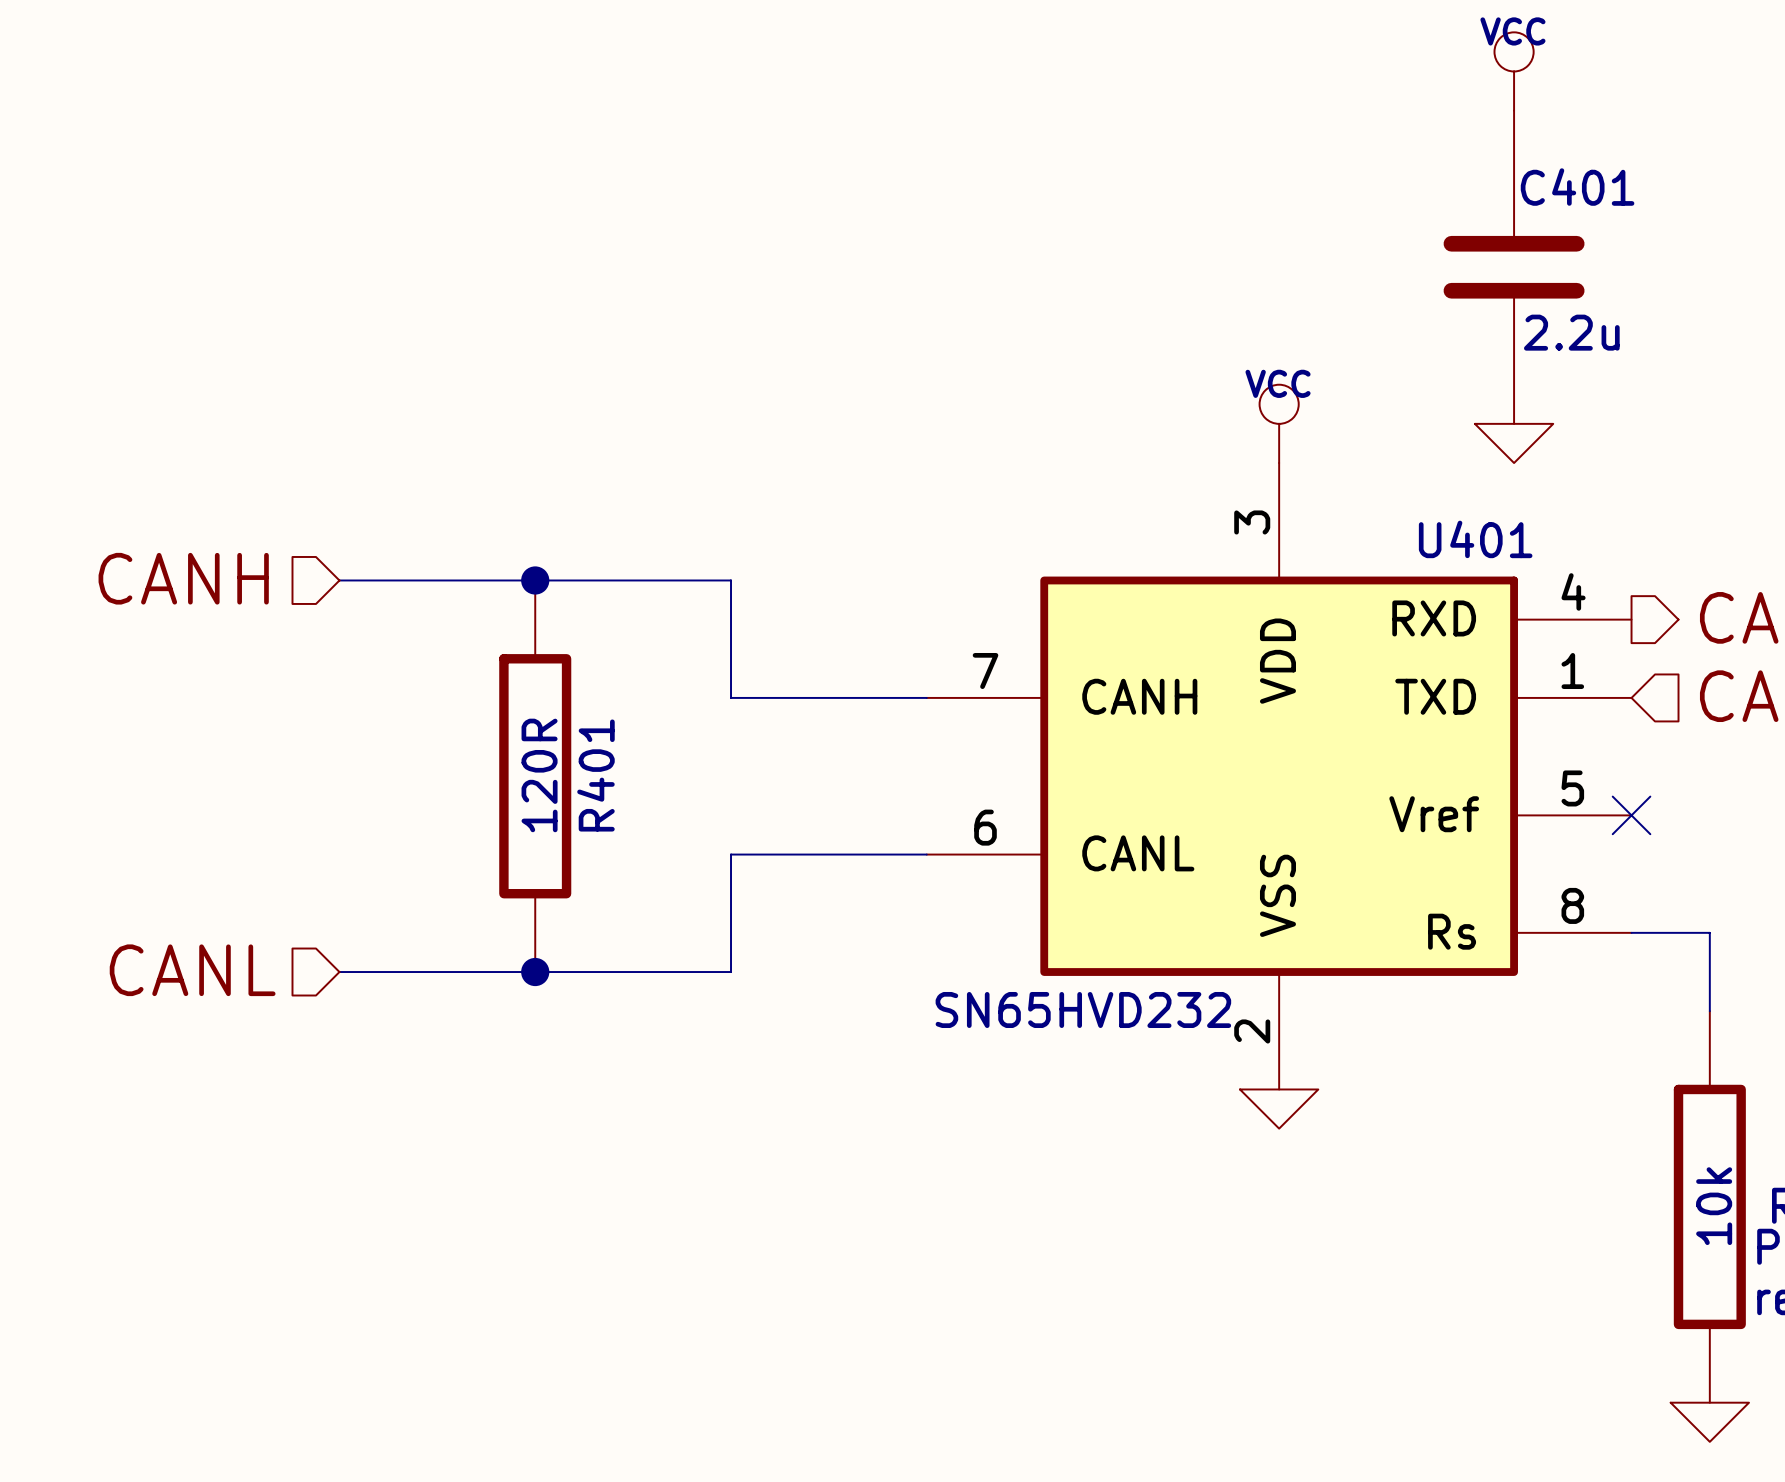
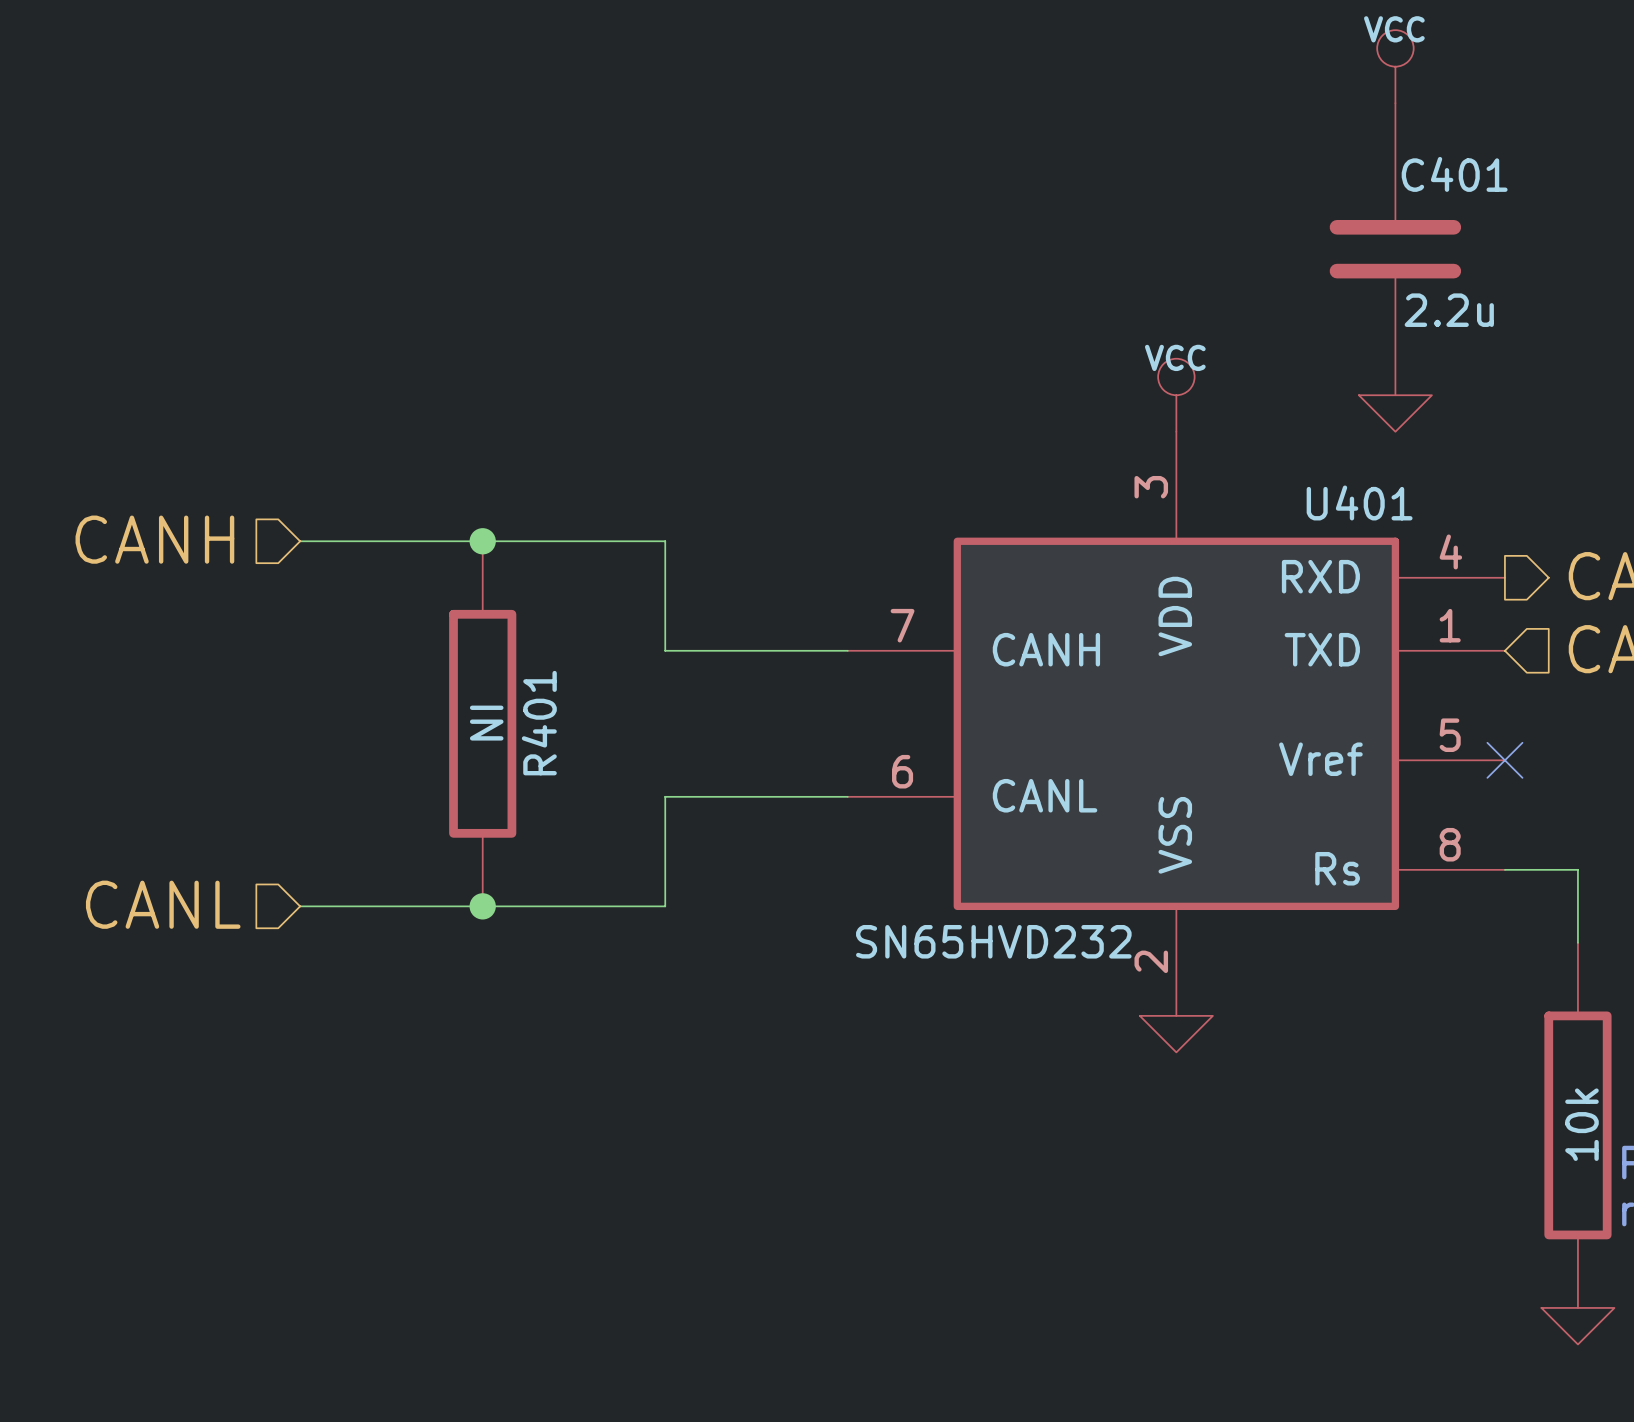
R401 value: 120R (539, 775) -> NI (486, 723)

